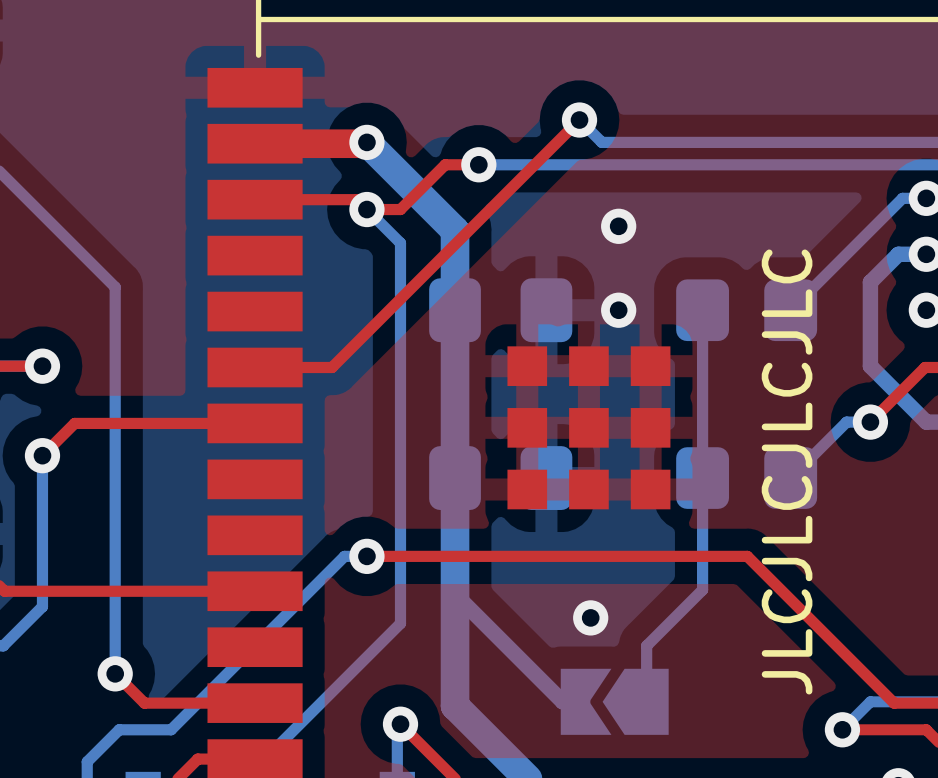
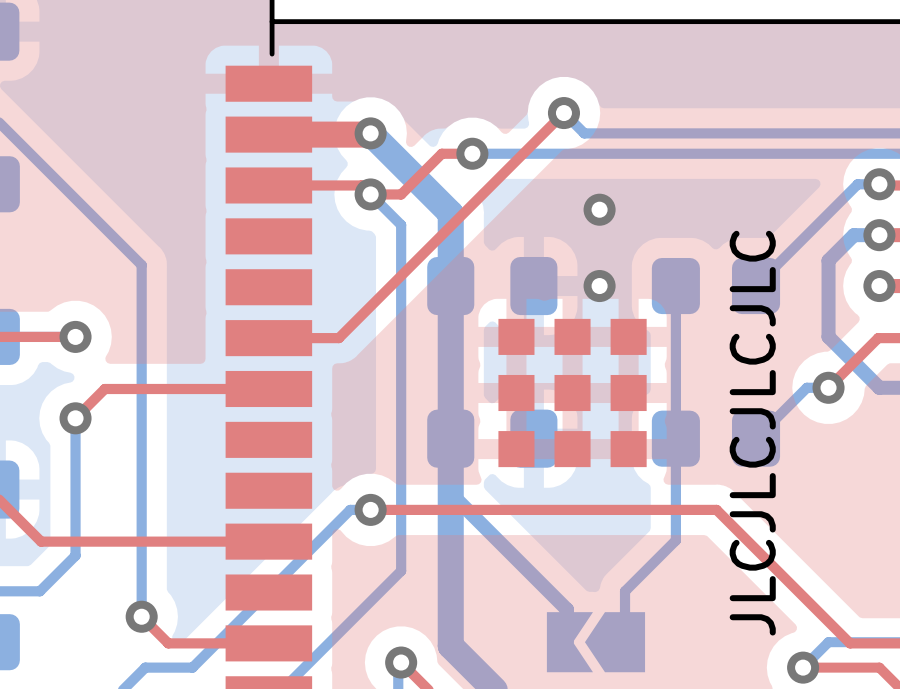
bottom track: (455, 538) (455, 594) (562, 701) (582, 701) -> (450, 493) (566, 609) (566, 642)
via: (590, 617) -> none

